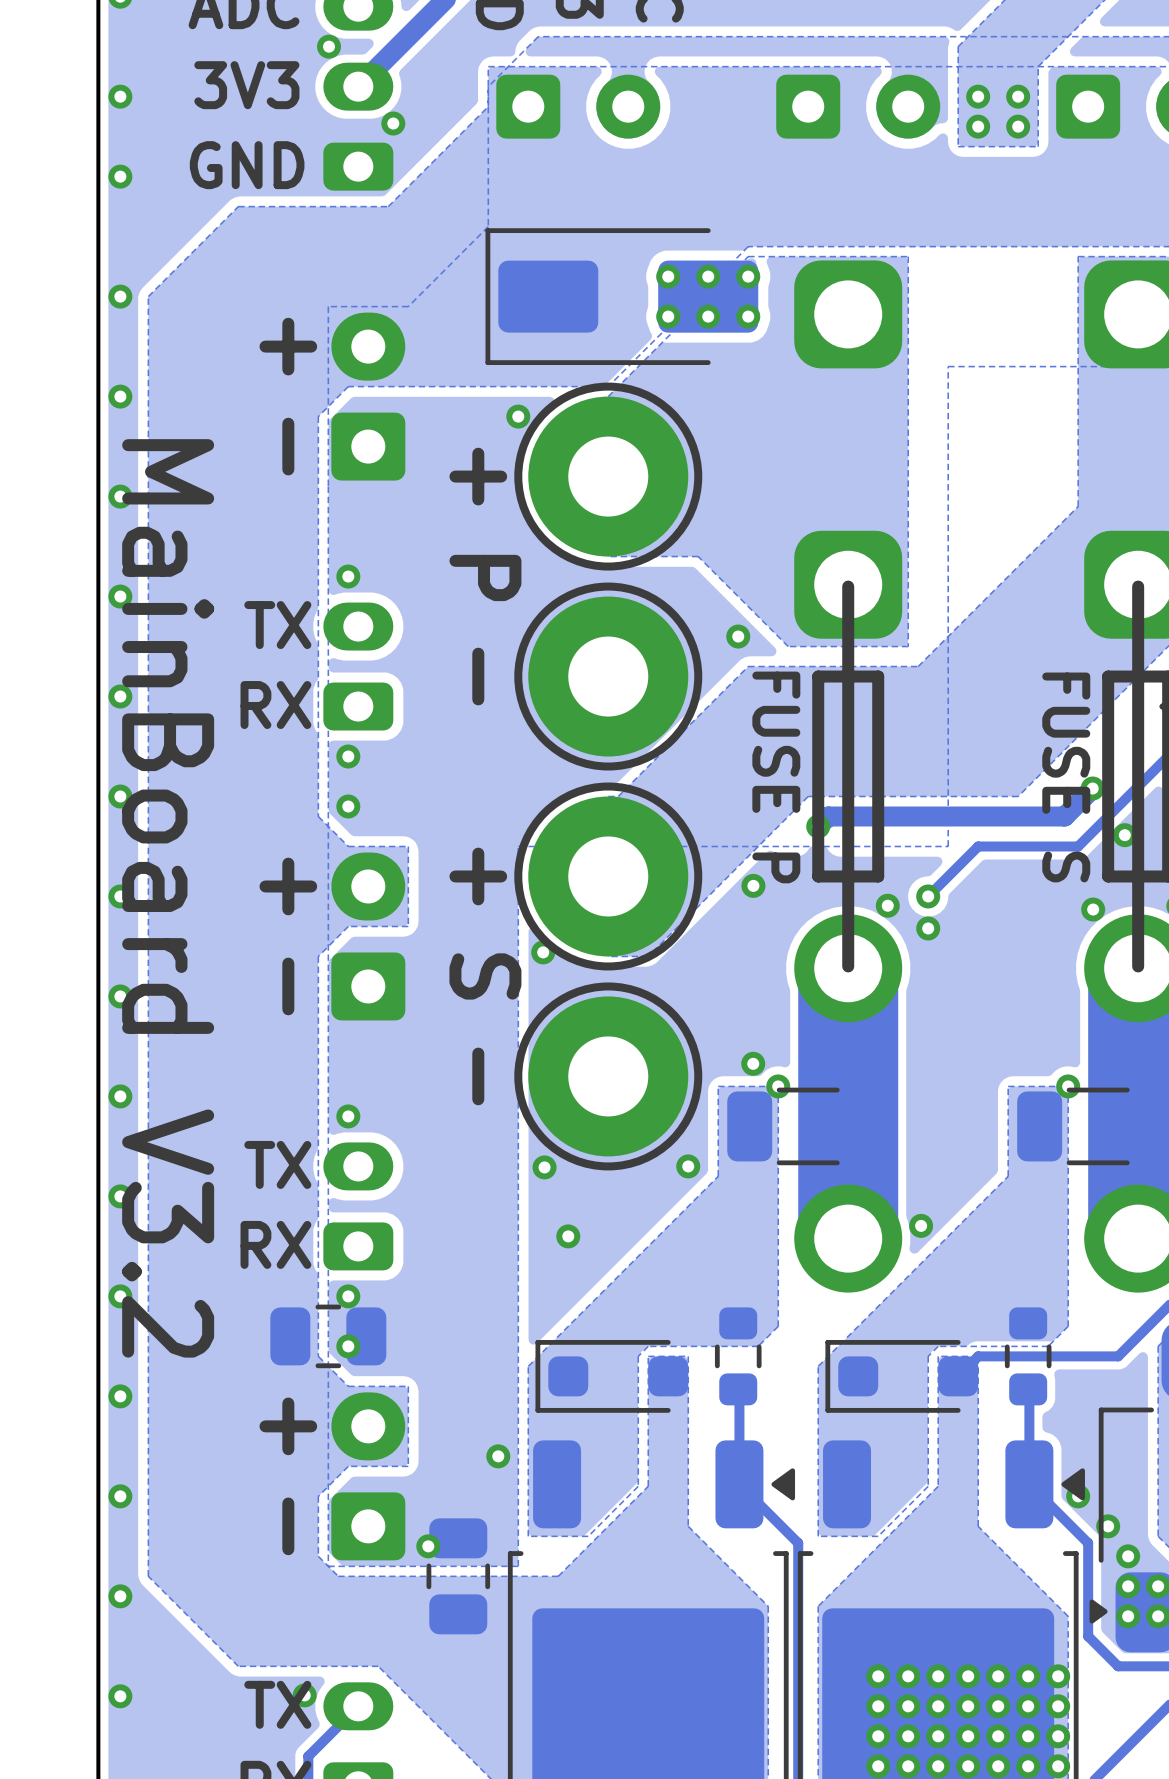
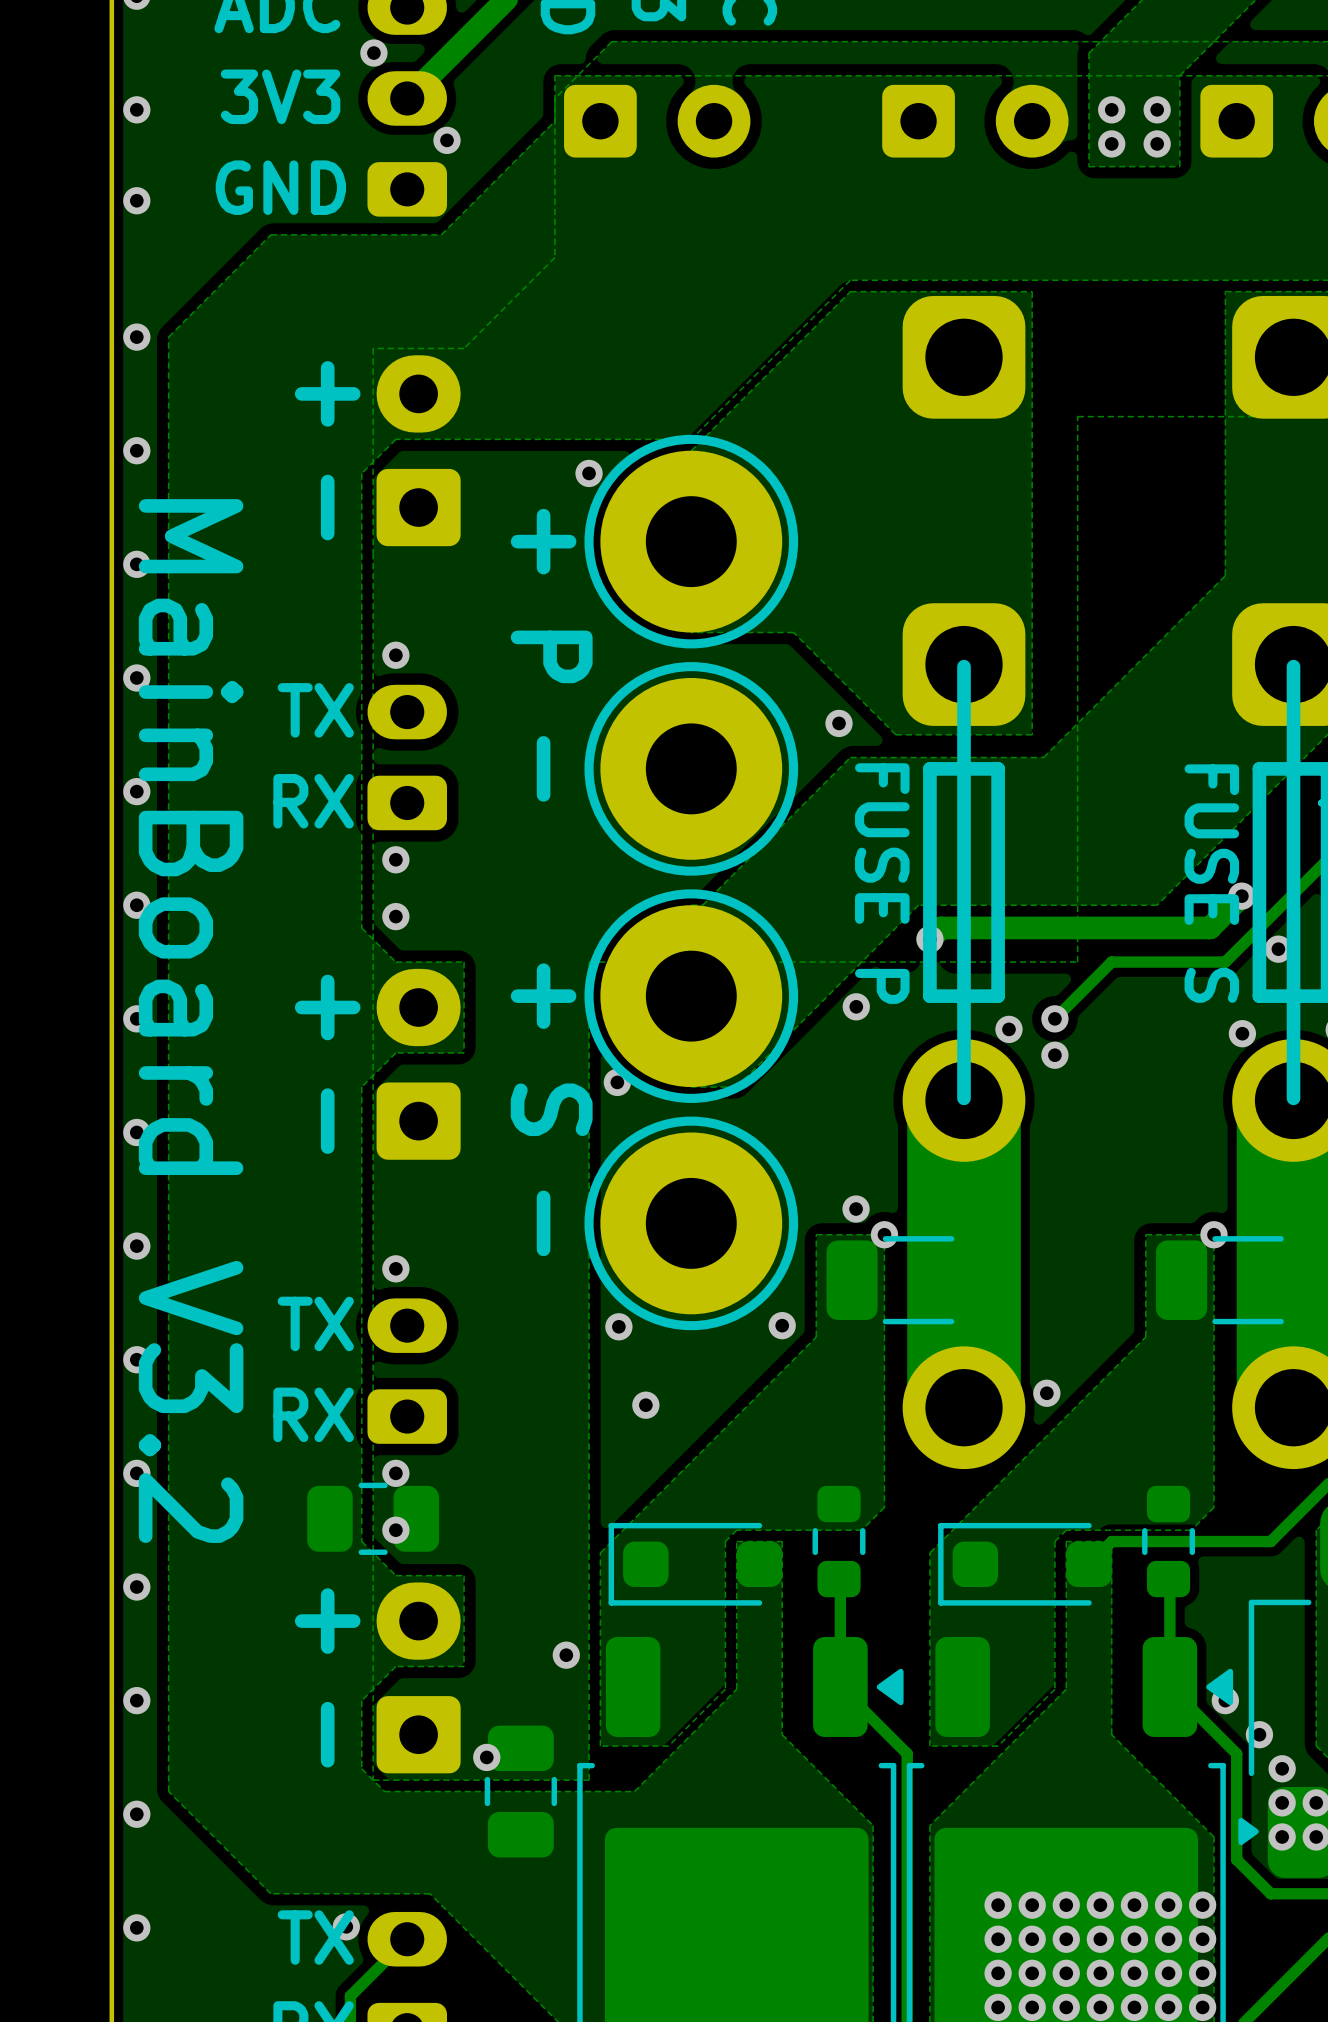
via: (668, 276) -> none
via: (708, 276) -> none
via: (748, 276) -> none
part: (621, 296) -> none
via: (668, 316) -> none
via: (708, 316) -> none
via: (748, 316) -> none

